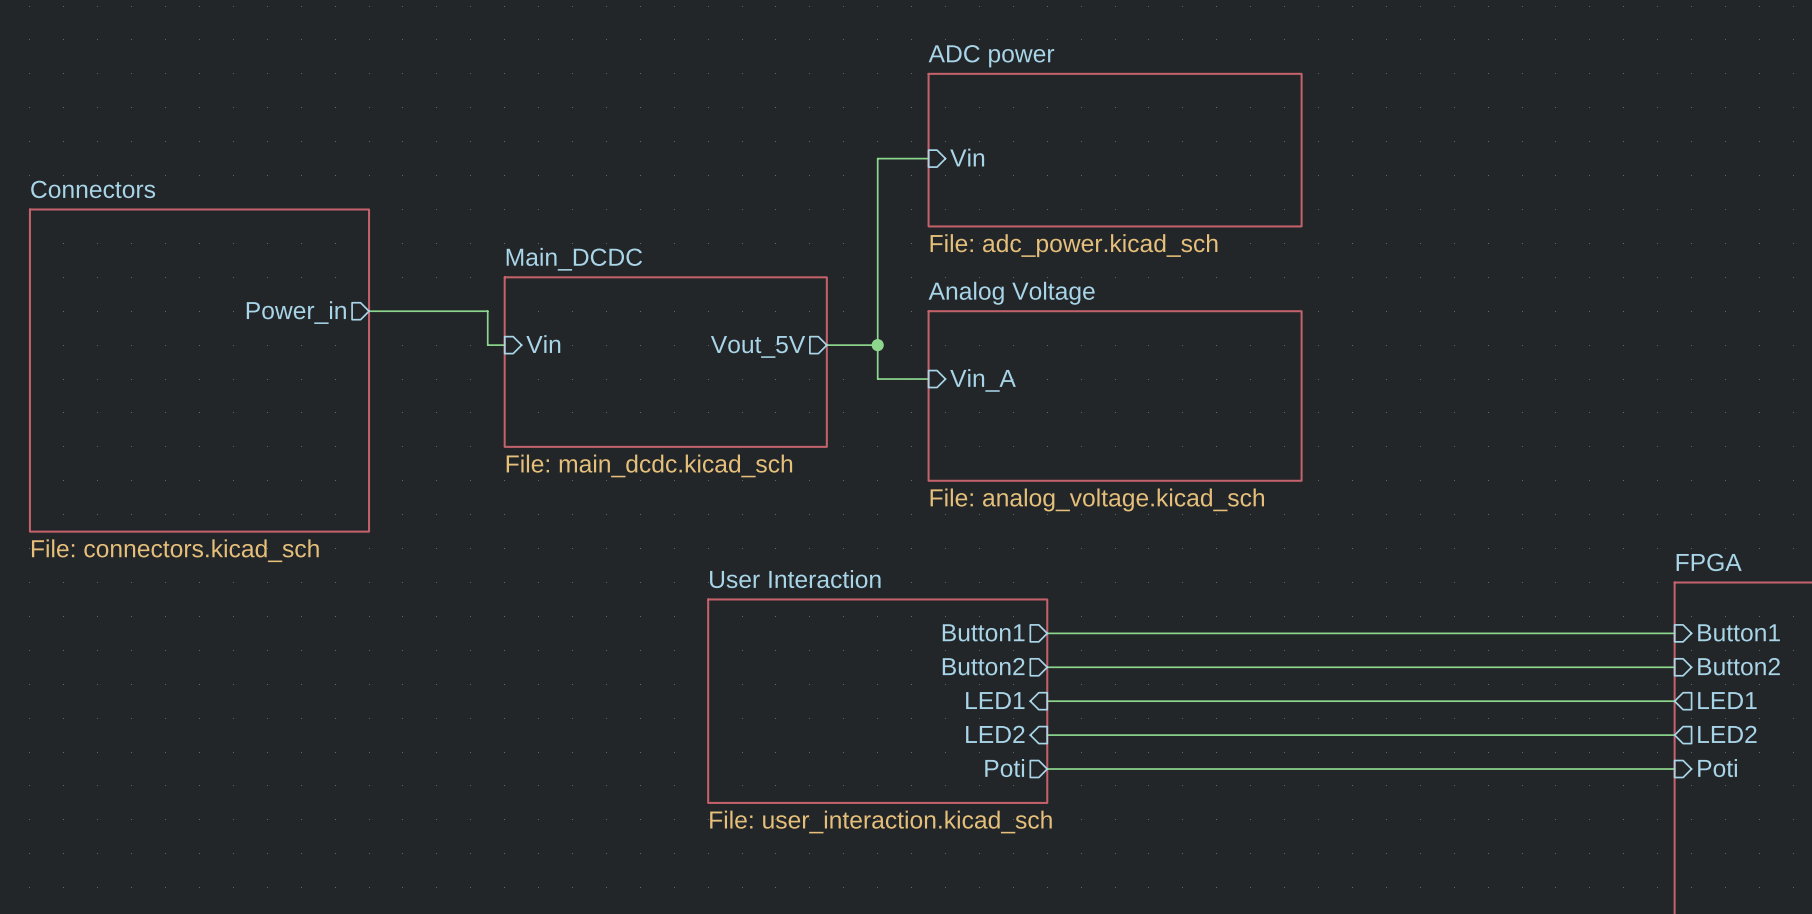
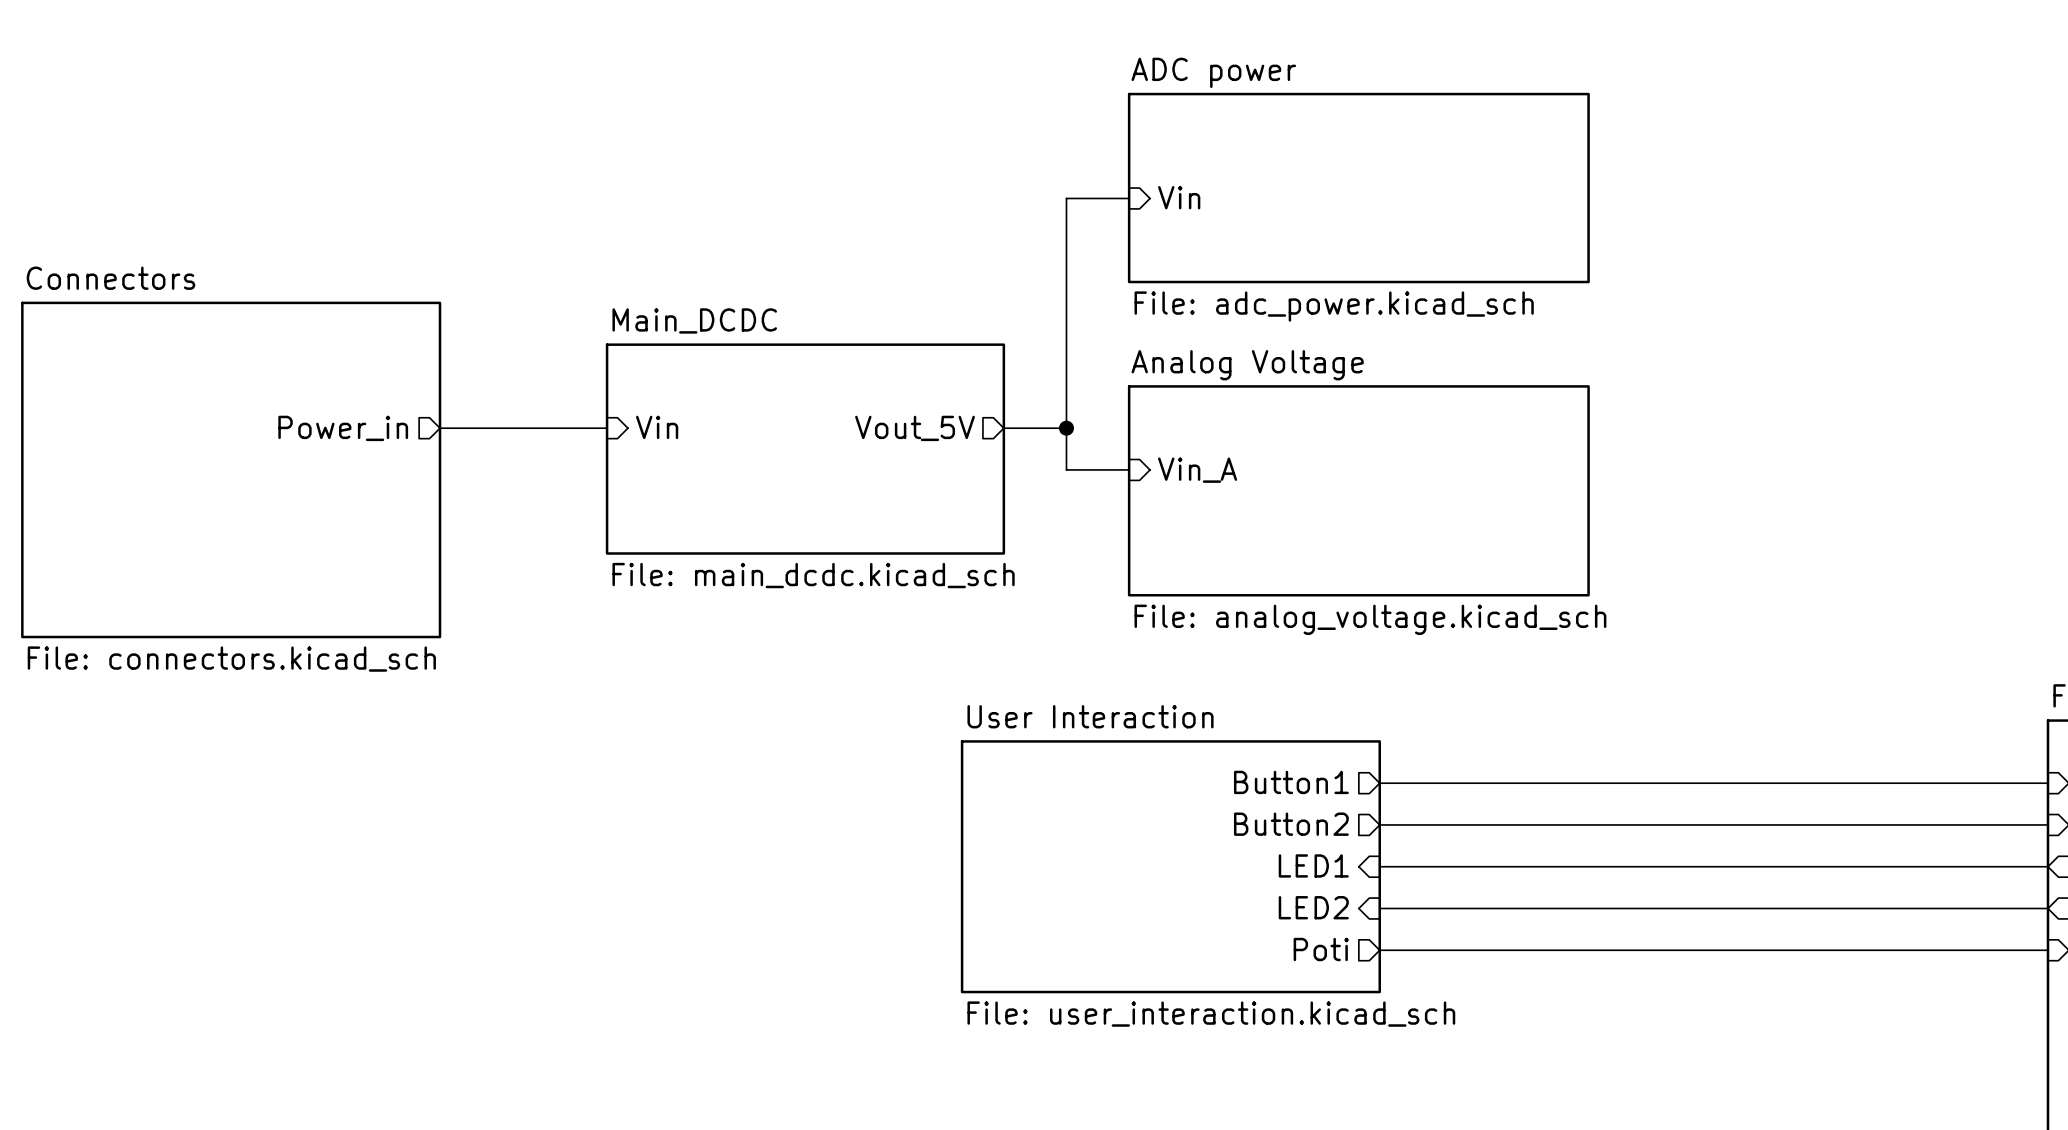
sheet Connectors shape: [28, 208, 371, 533] -> [21, 301, 442, 639]
wire: (369, 311) (487, 311) (487, 345) -> (440, 428) (586, 428)
sheet pin position: Power_in (296, 312) -> Power_in (343, 428)
sheet pin position: Button1 (983, 632) -> Button1 (1291, 782)
wire: (1047, 633) (1132, 633) -> none
sheet pin position: Button2 (983, 666) -> Button2 (1291, 824)
wire: (1047, 667) (1132, 667) -> none
sheet pin position: LED1 (995, 700) -> LED1 (1313, 865)
sheet User Interaction position: (877, 701) -> (1170, 866)
wire: (1047, 701) (1132, 701) -> none
sheet pin position: LED2 (995, 734) -> LED2 (1313, 907)
wire: (1047, 735) (1132, 735) -> none
sheet pin position: Poti (1004, 768) -> Poti (1321, 949)
wire: (1047, 769) (1132, 769) -> none

